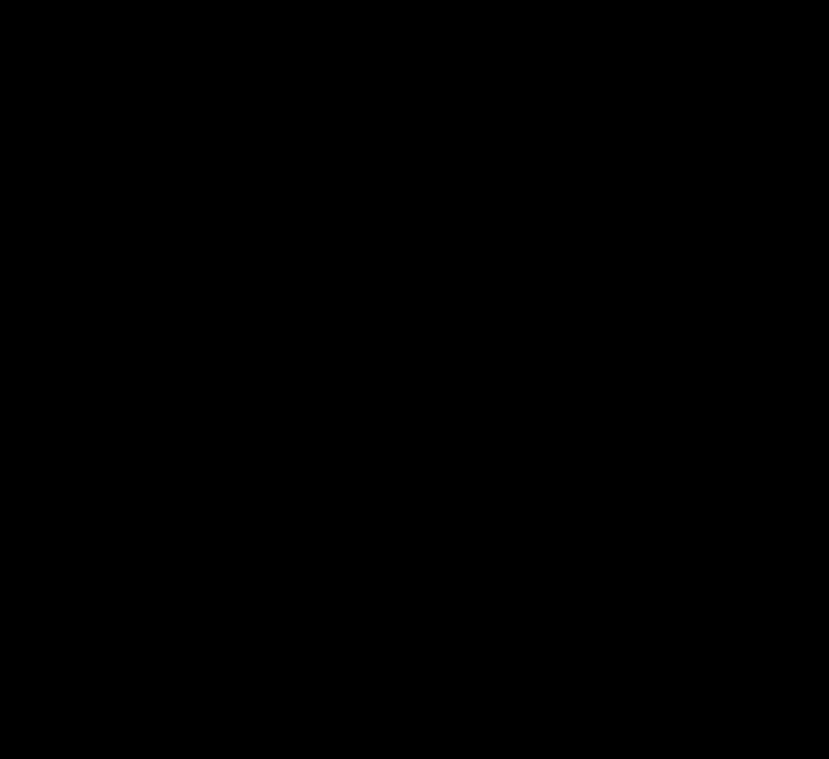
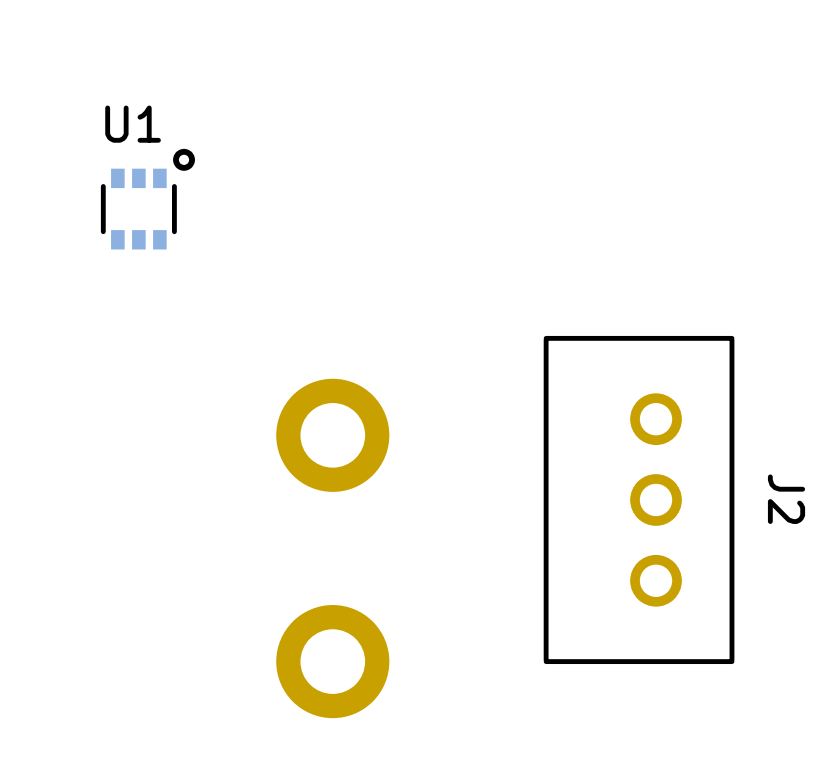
U1: none -> (147, 199)
part: none -> (332, 435)
J2: none -> (639, 499)
part: none -> (332, 661)

